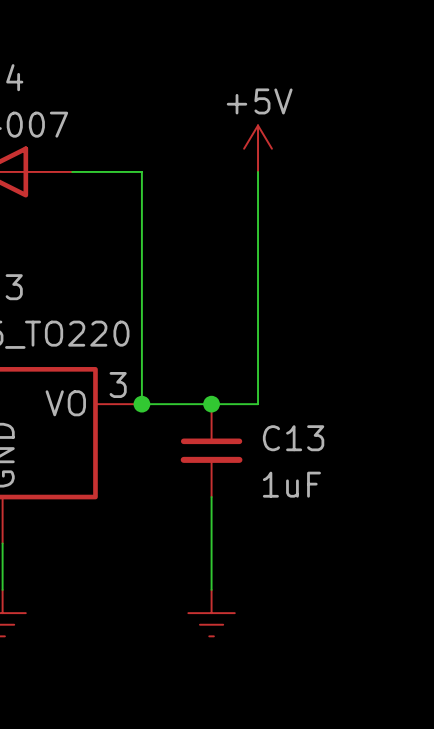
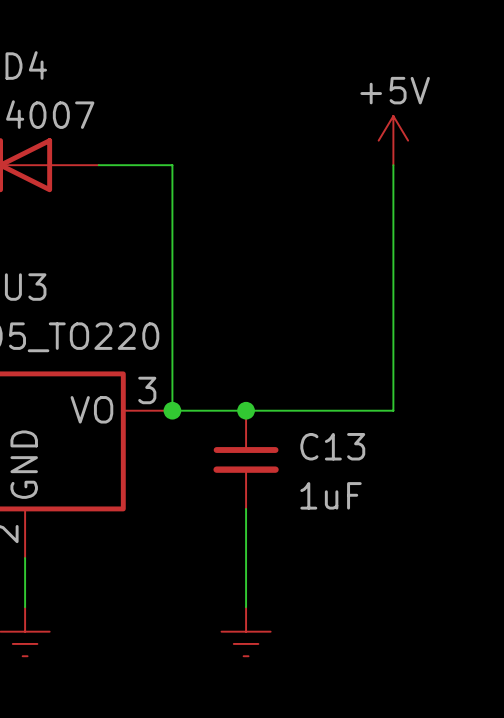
power symbol position: +5V (258, 148) -> +5V (393, 140)
wire: (258, 171) (258, 404) -> (393, 165) (393, 410) (295, 410)

